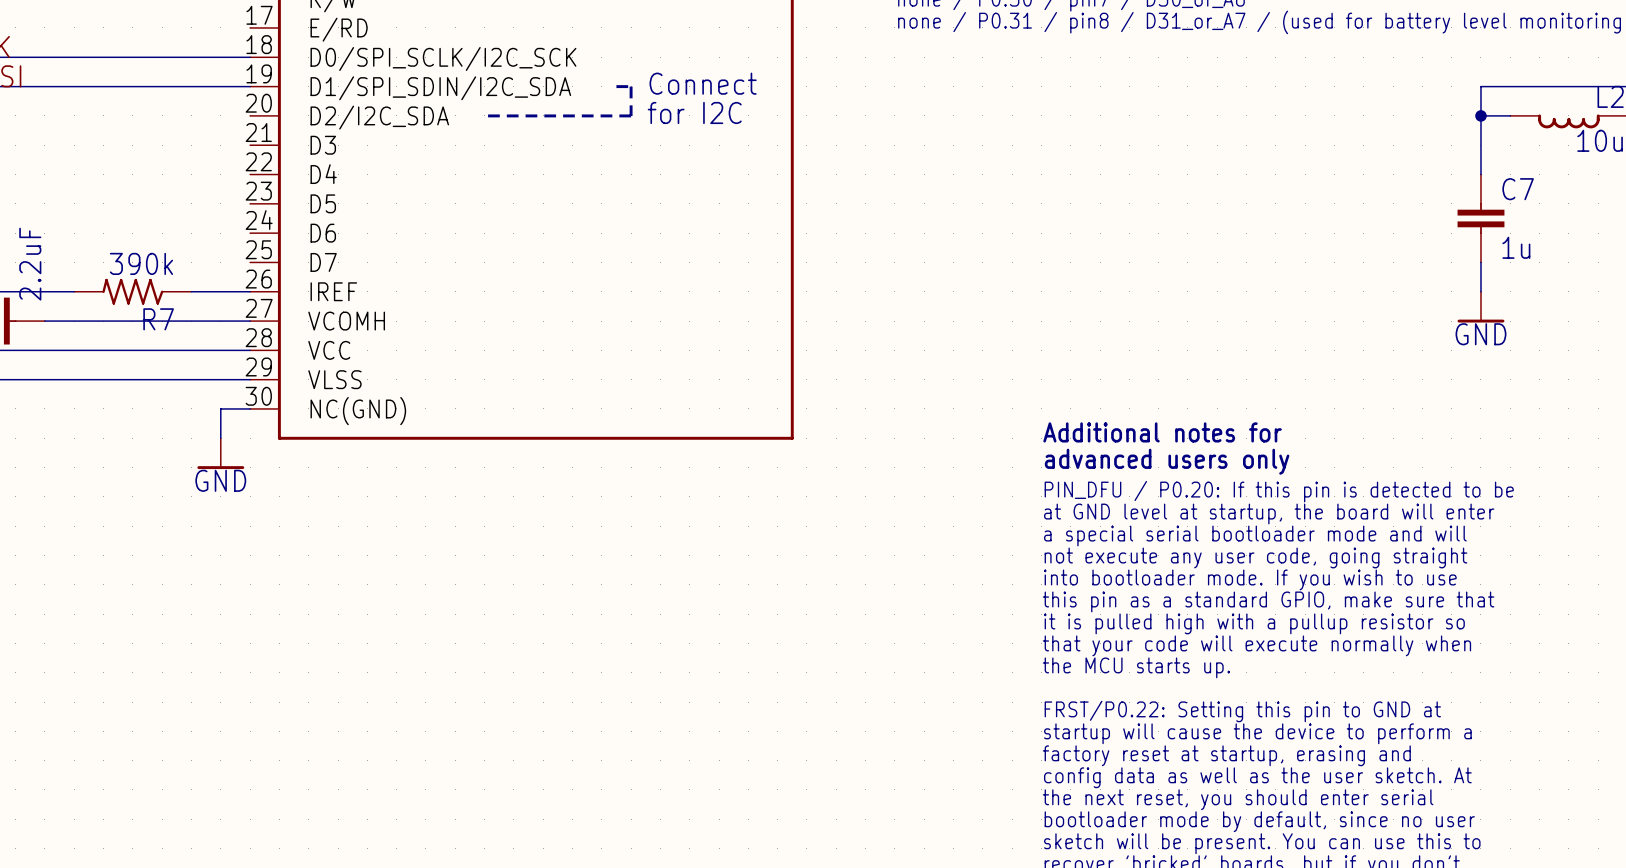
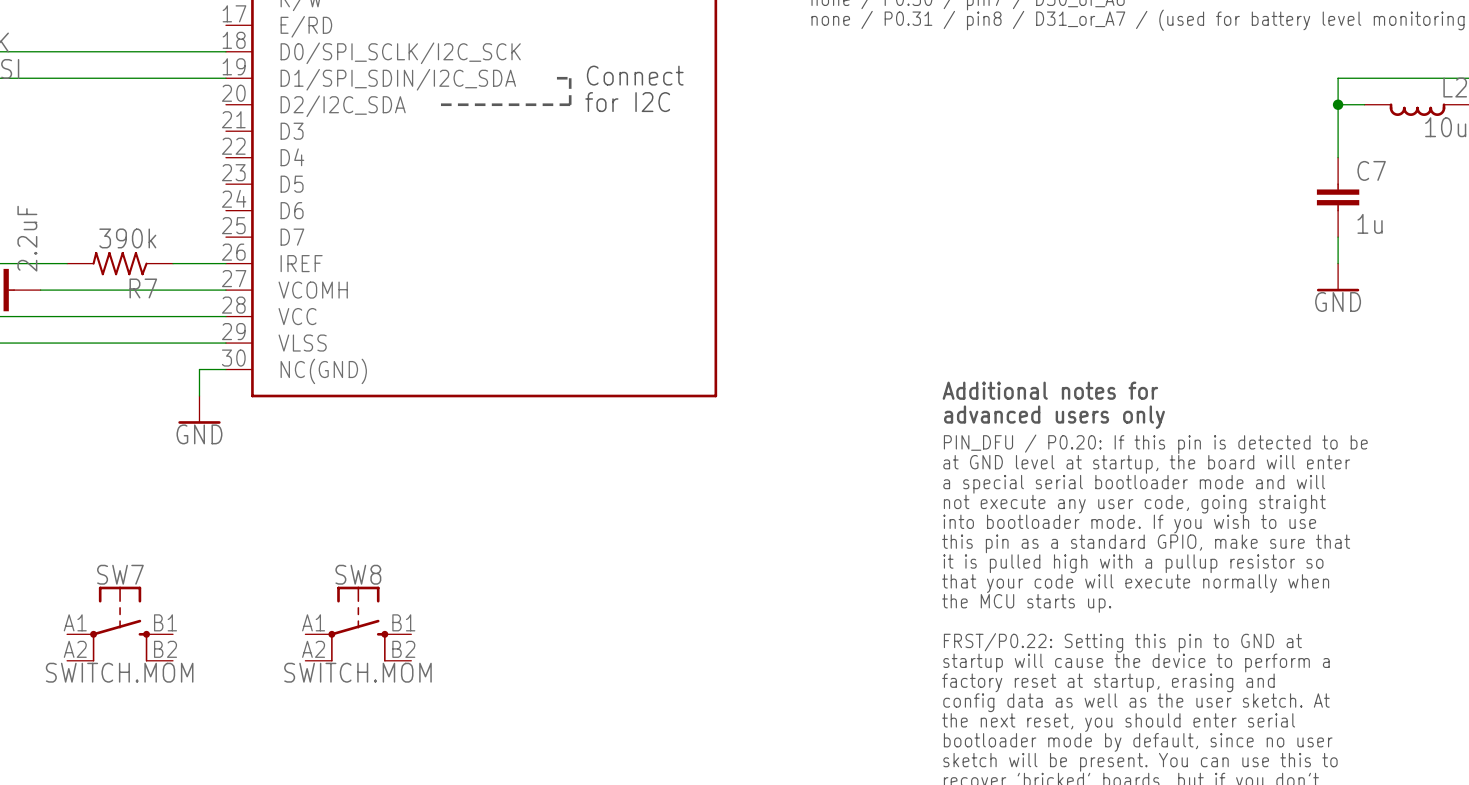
SW7: none -> SWITCH.MOM (120, 624)
SW8: none -> SWITCH.MOM (358, 624)

